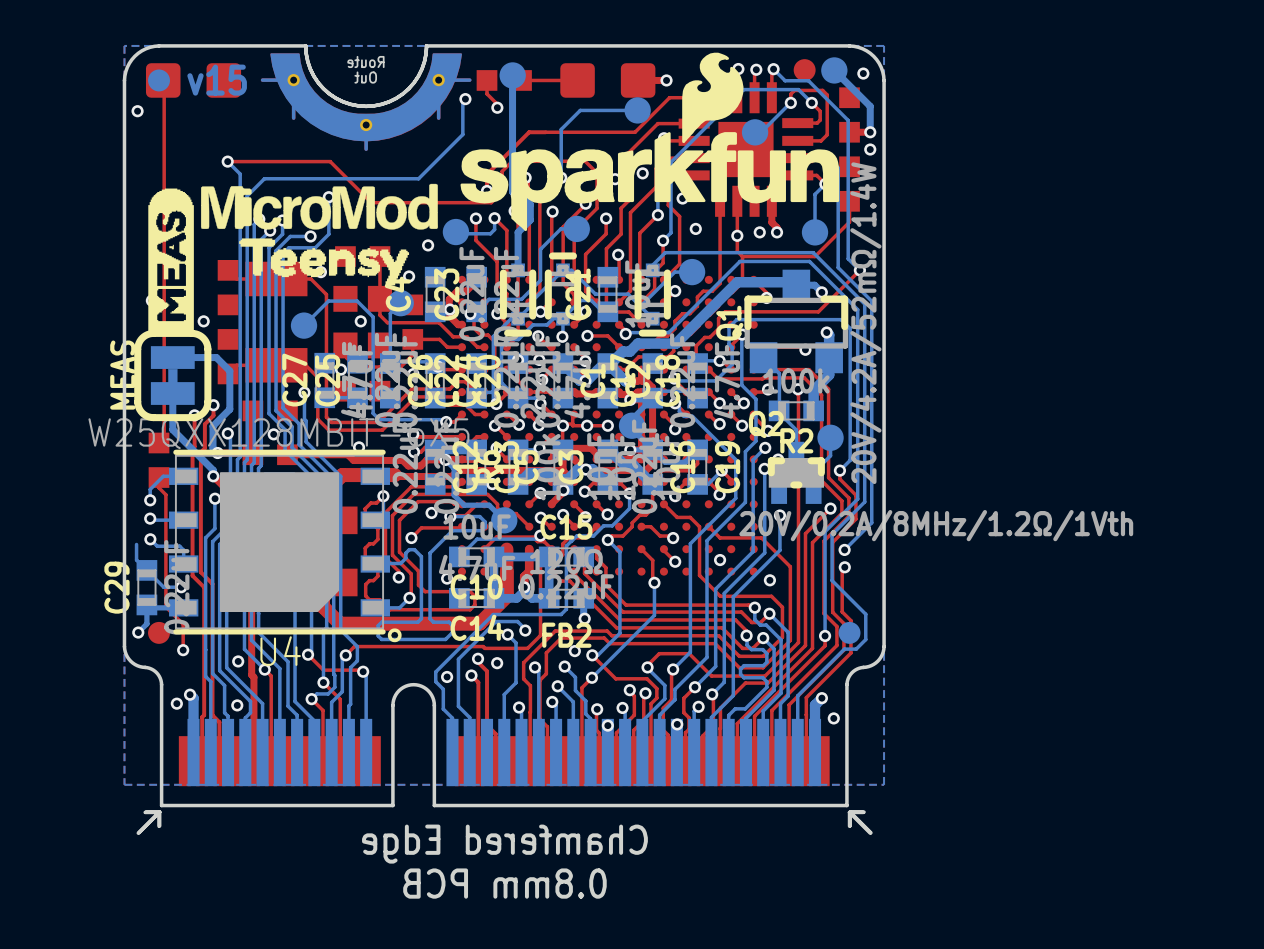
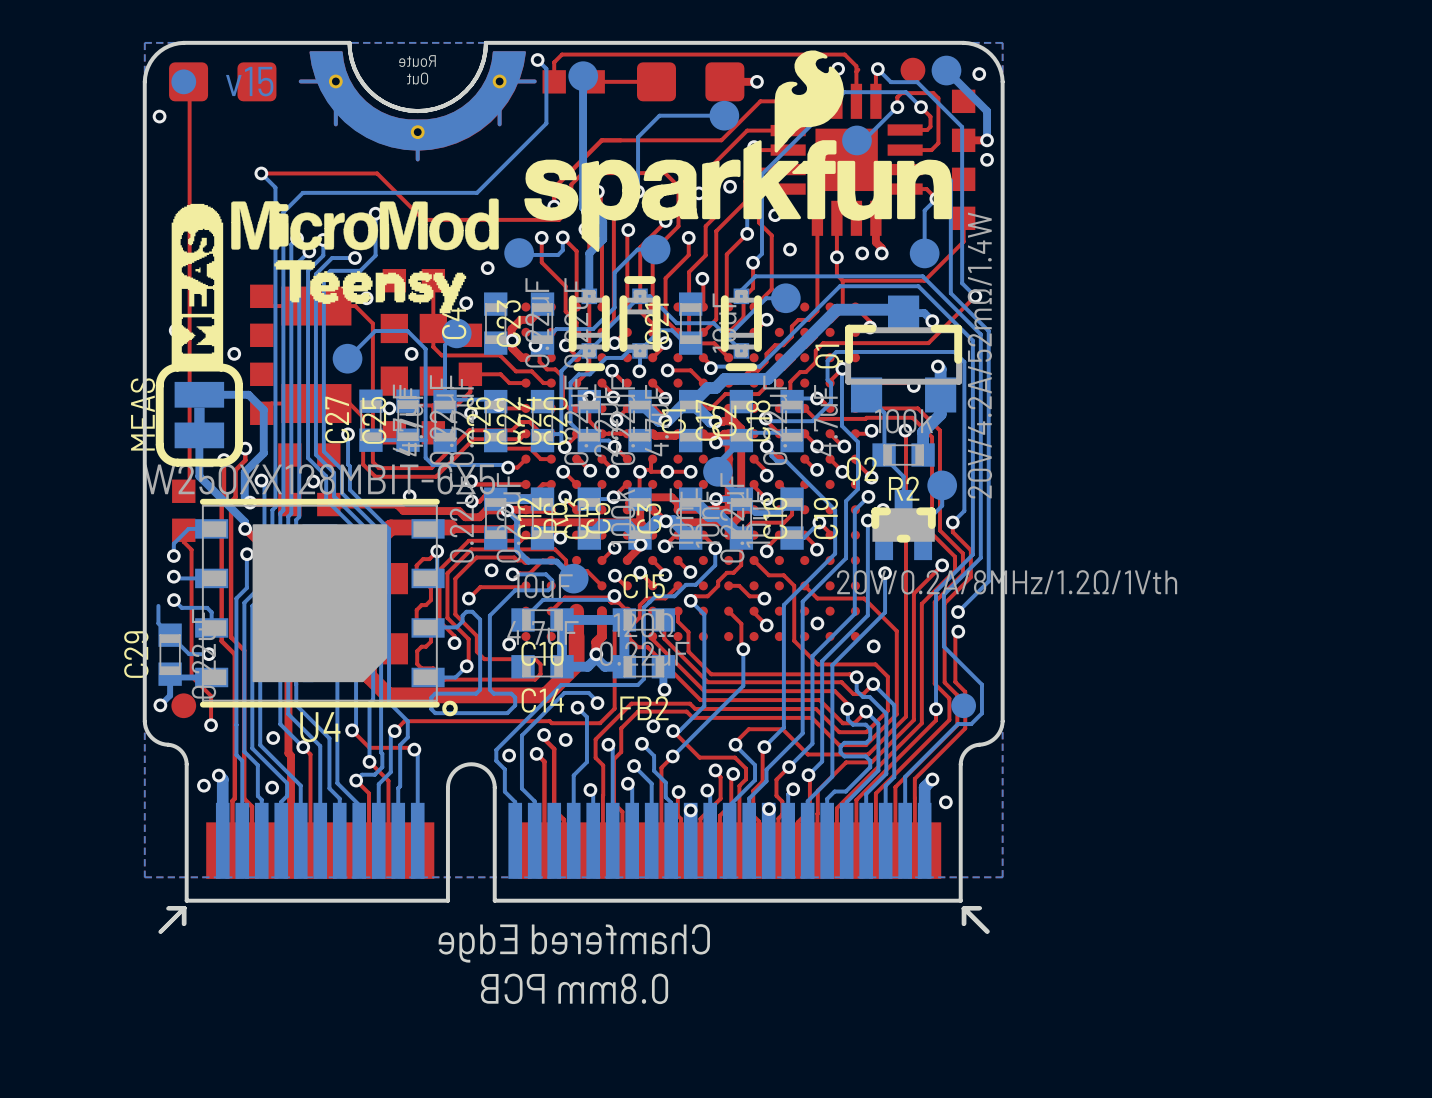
via: none -> (537, 60)
via: (756, 69) -> none
top track: (487, 80) (487, 93) (497, 104) (497, 107) -> (554, 81) (554, 62) (562, 54) (844, 54) (856, 66) (856, 71)
bottom track: (465, 99) (462, 101) (462, 134) -> (537, 60) (546, 68) (546, 123) (526, 142)
via: (465, 99) -> none
via: (497, 107) -> none

